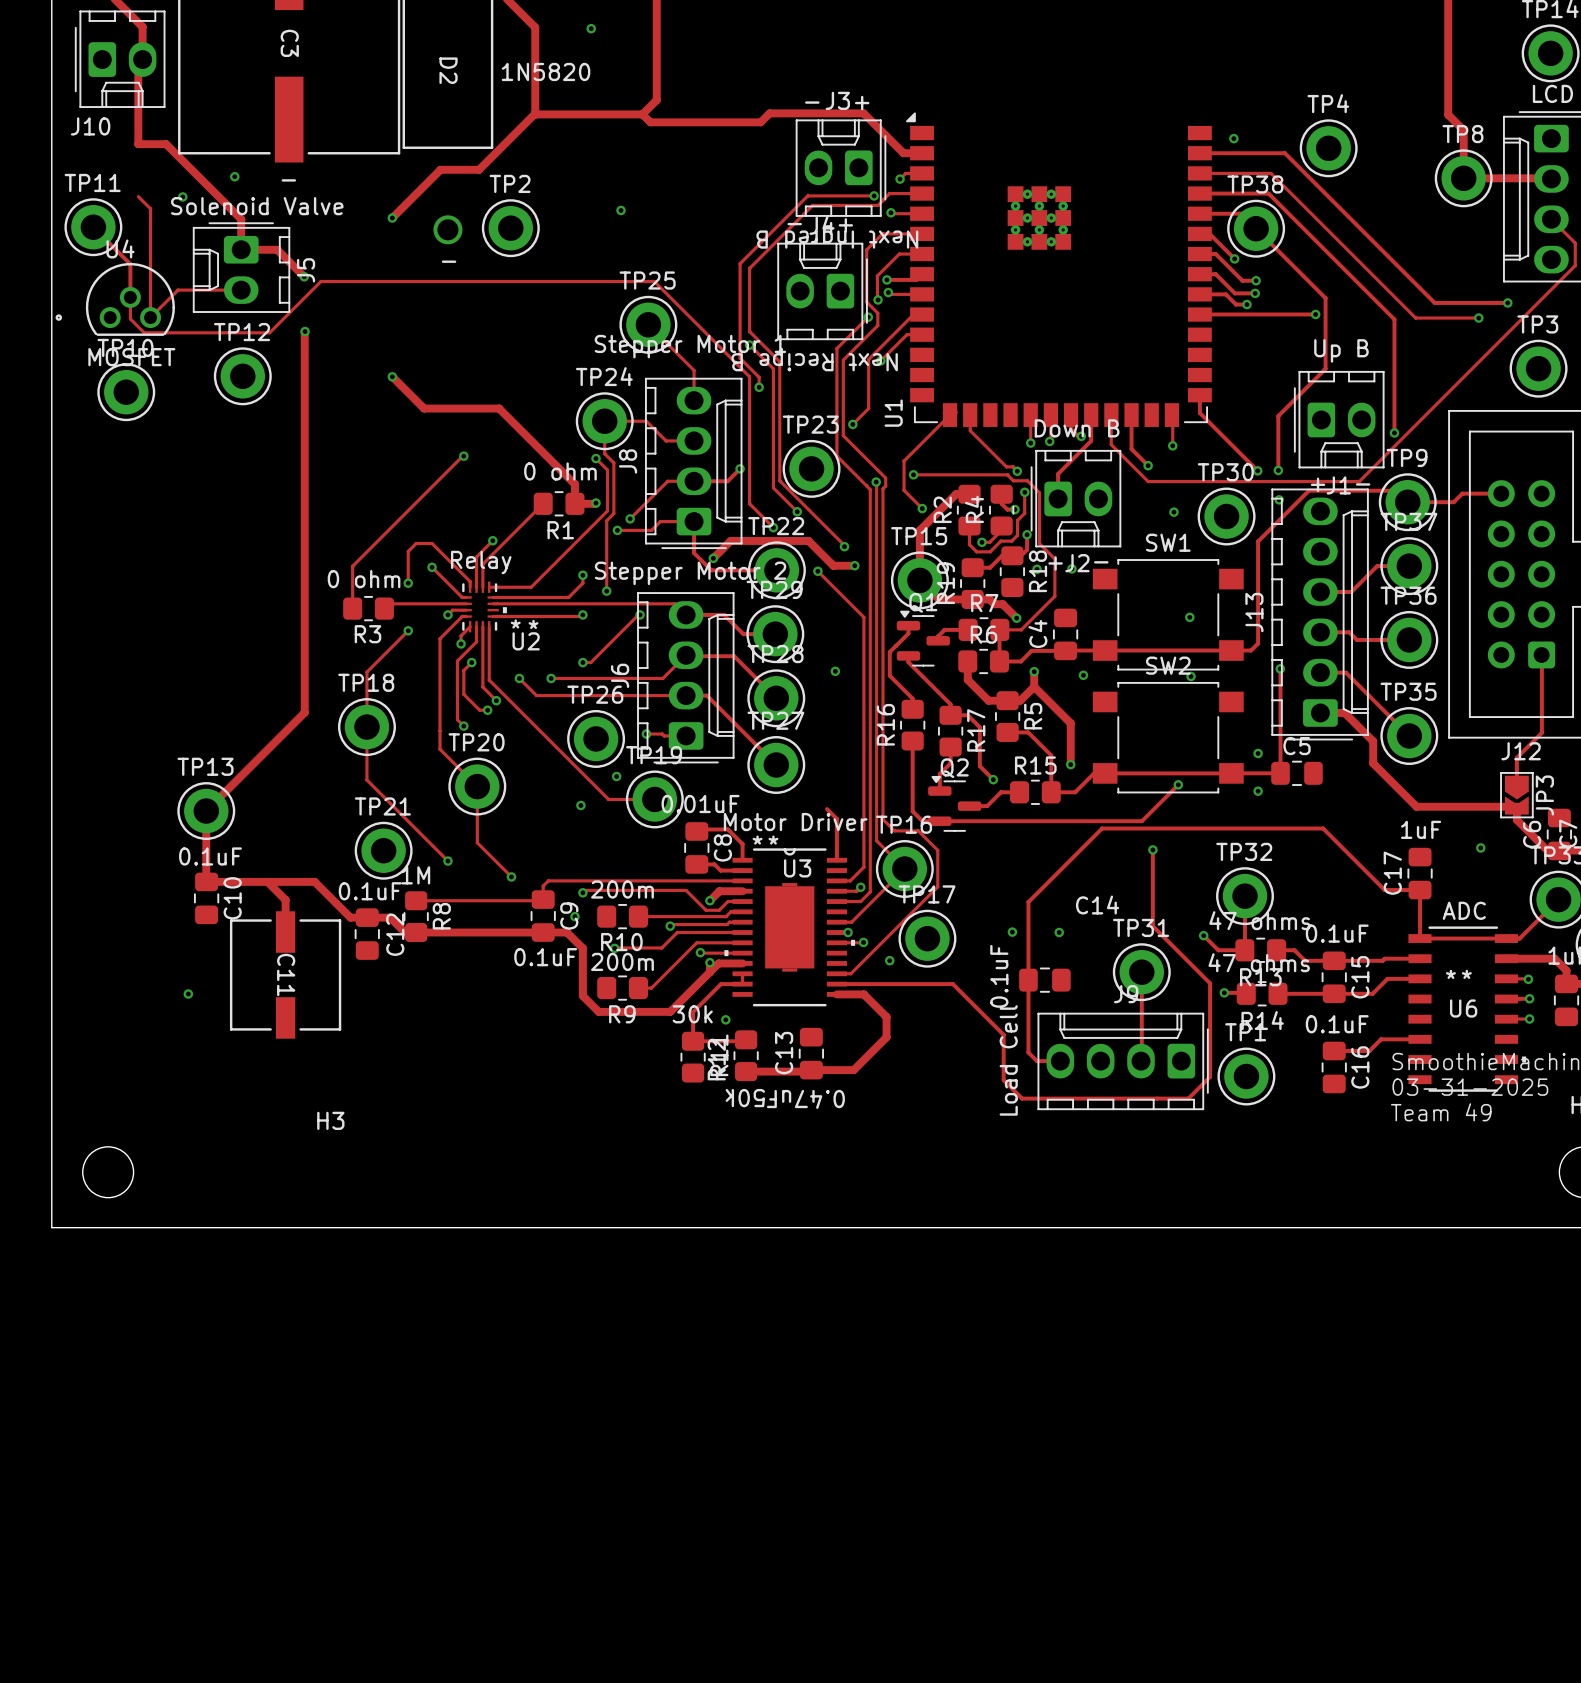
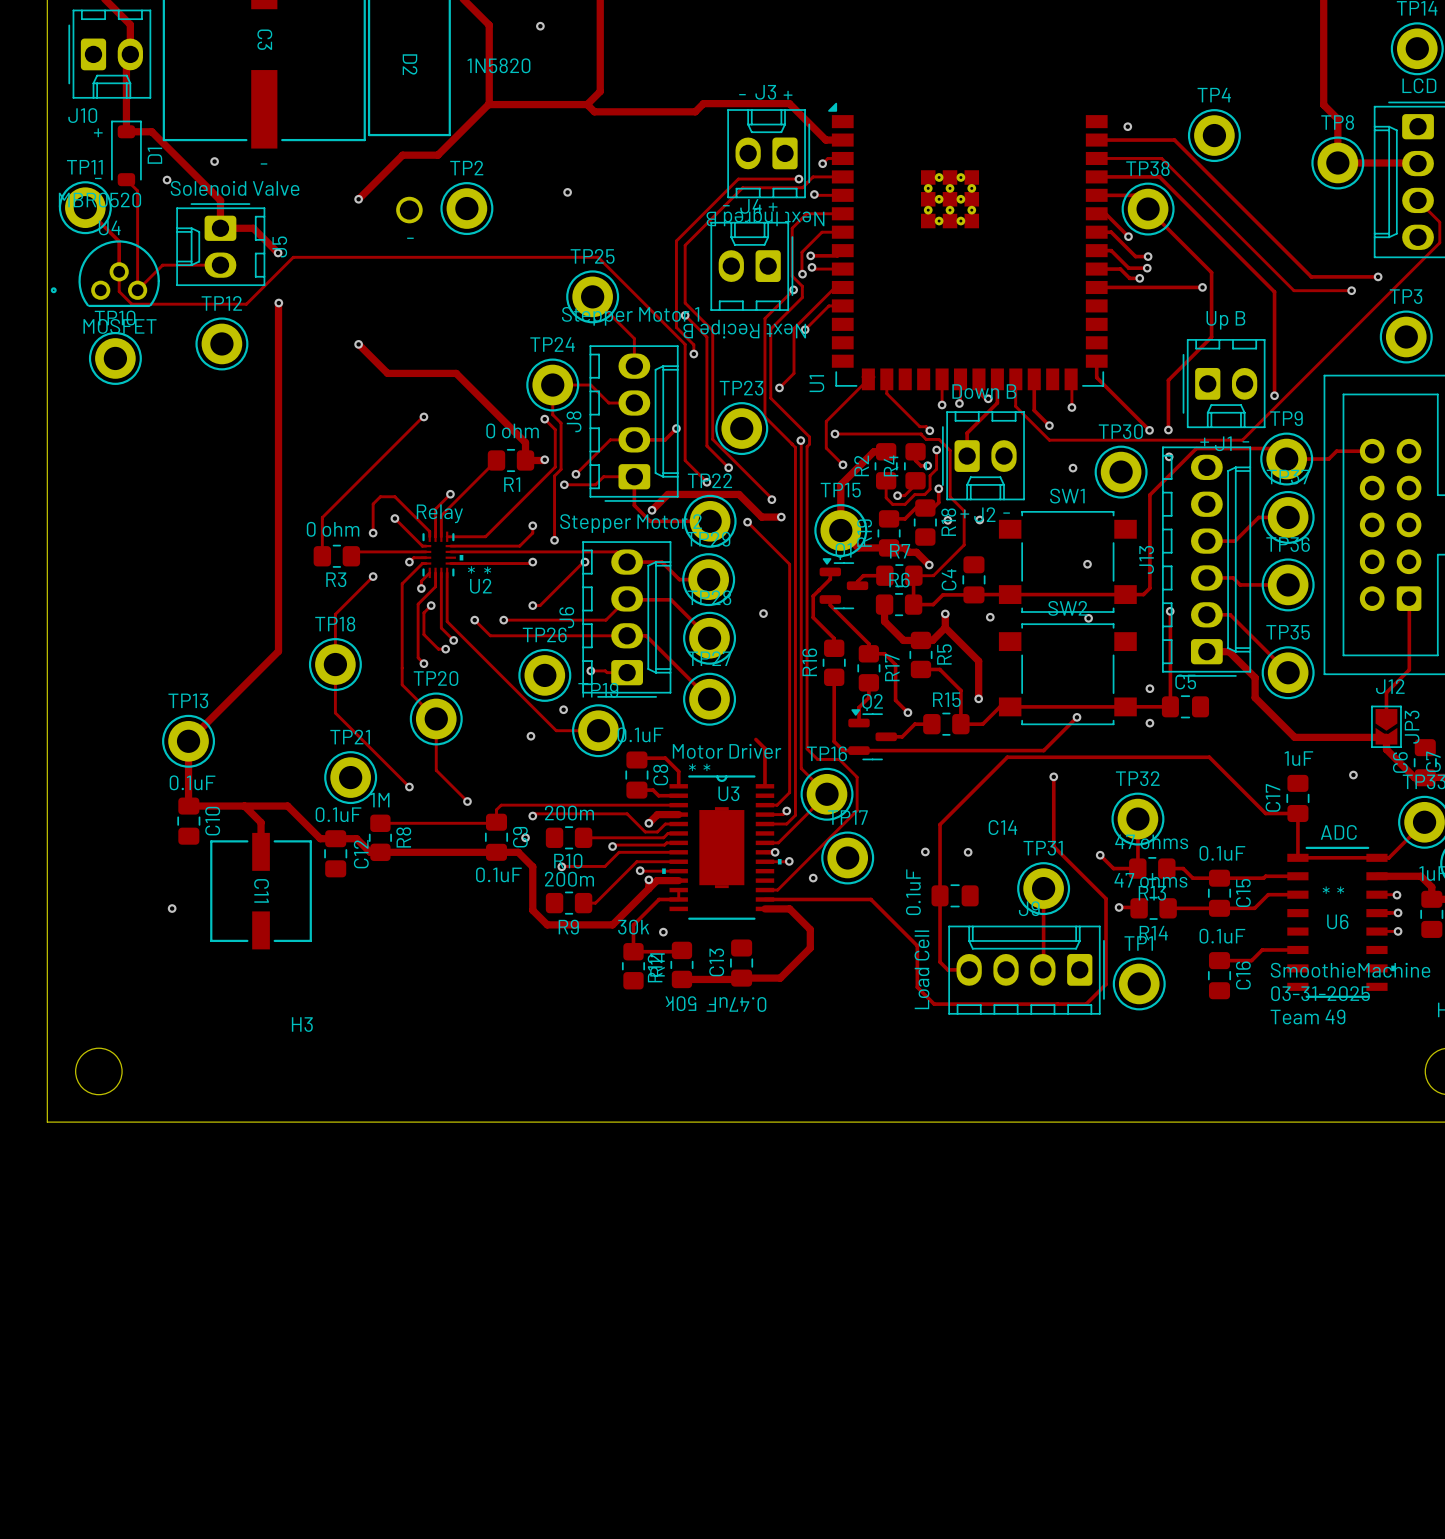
D1: none -> (126, 153)
C8 text: 0.01uF (700, 804) -> 0.1uF (640, 734)

